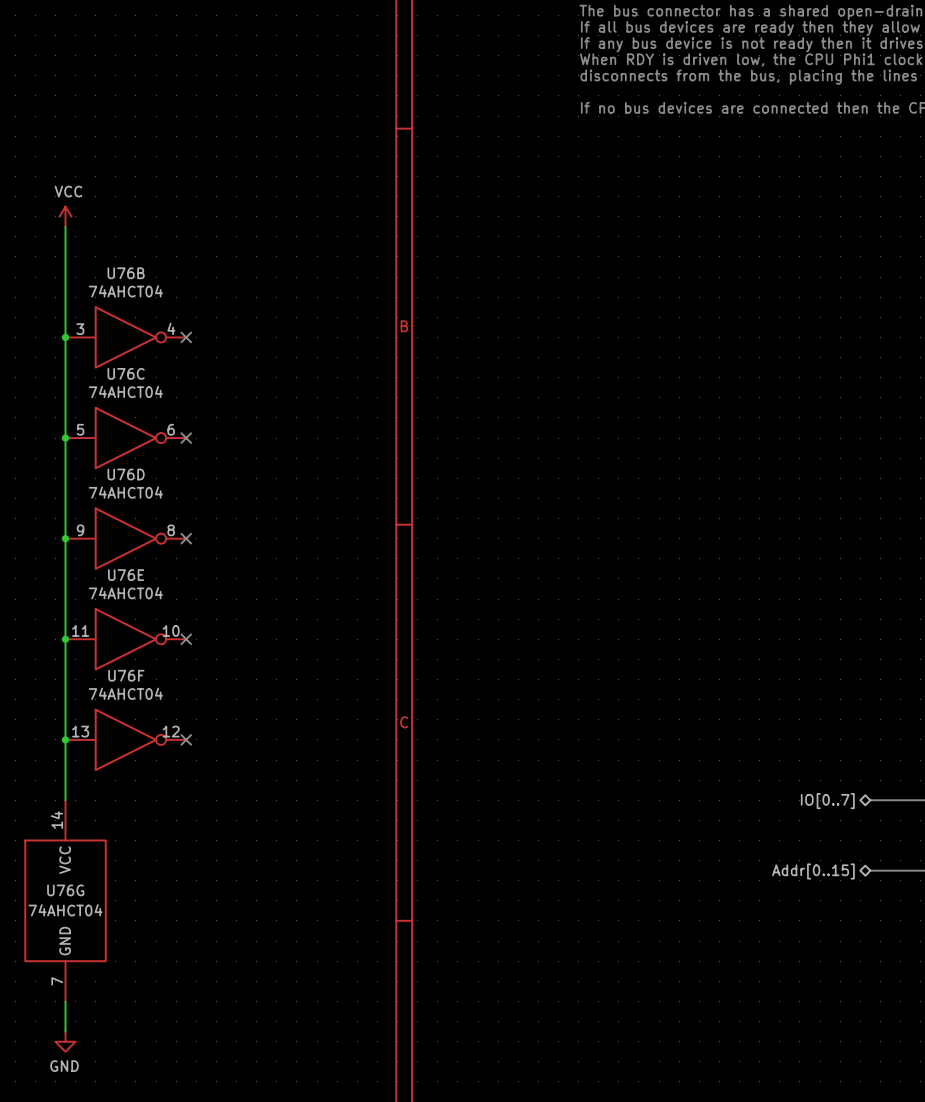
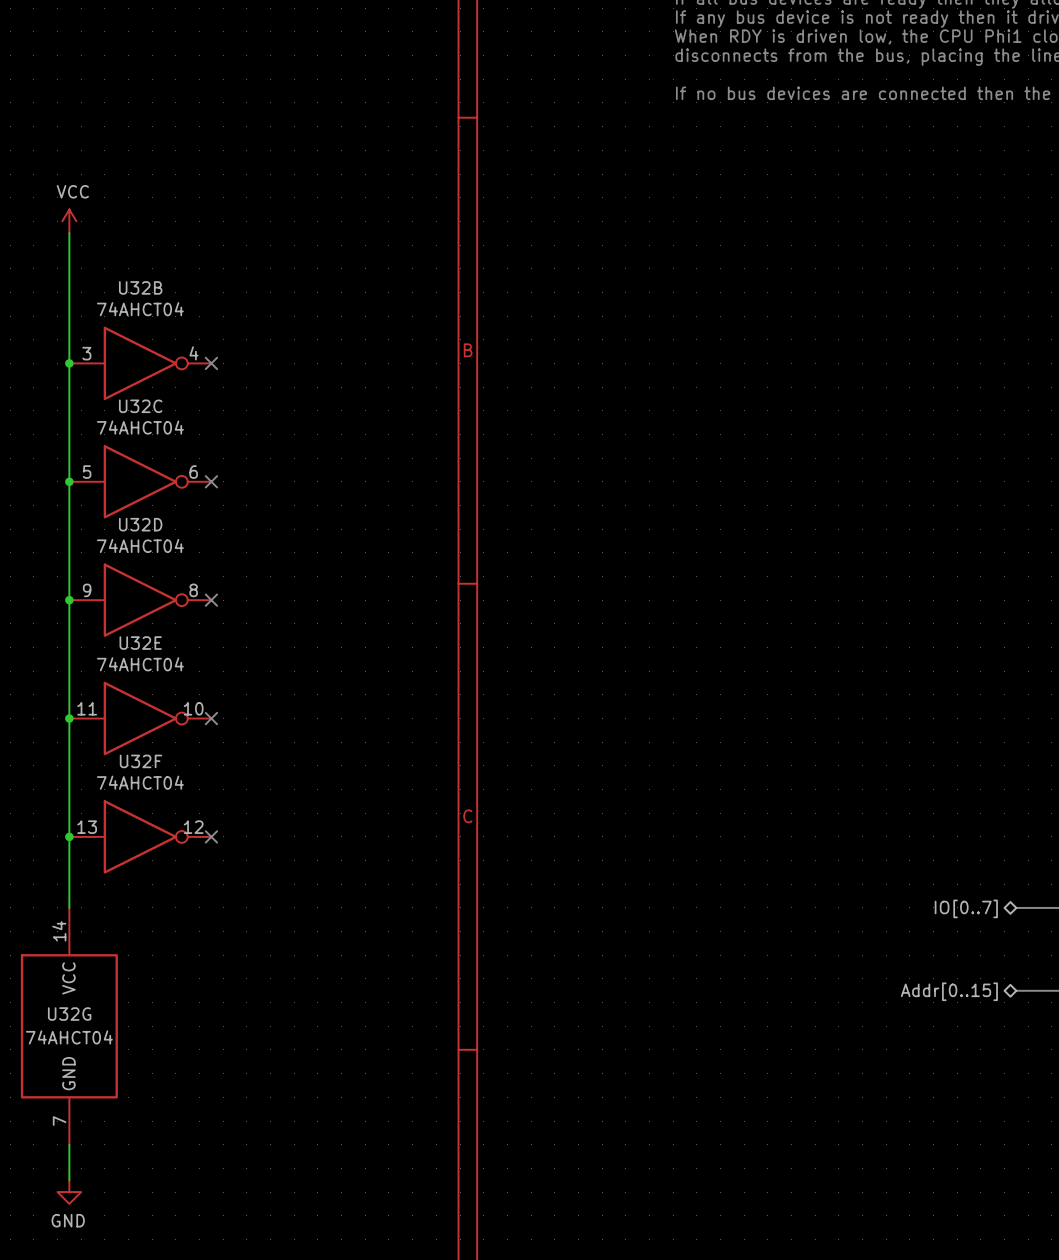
U76B name: U76B (126, 273) -> U32B (140, 287)
U76C name: U76C (126, 373) -> U32C (140, 406)
U76D name: U76D (126, 474) -> U32D (140, 524)
U76E name: U76E (126, 575) -> U32E (140, 643)
U76F name: U76F (126, 675) -> U32F (140, 761)
U76G name: U76G (65, 890) -> U32G (69, 1014)

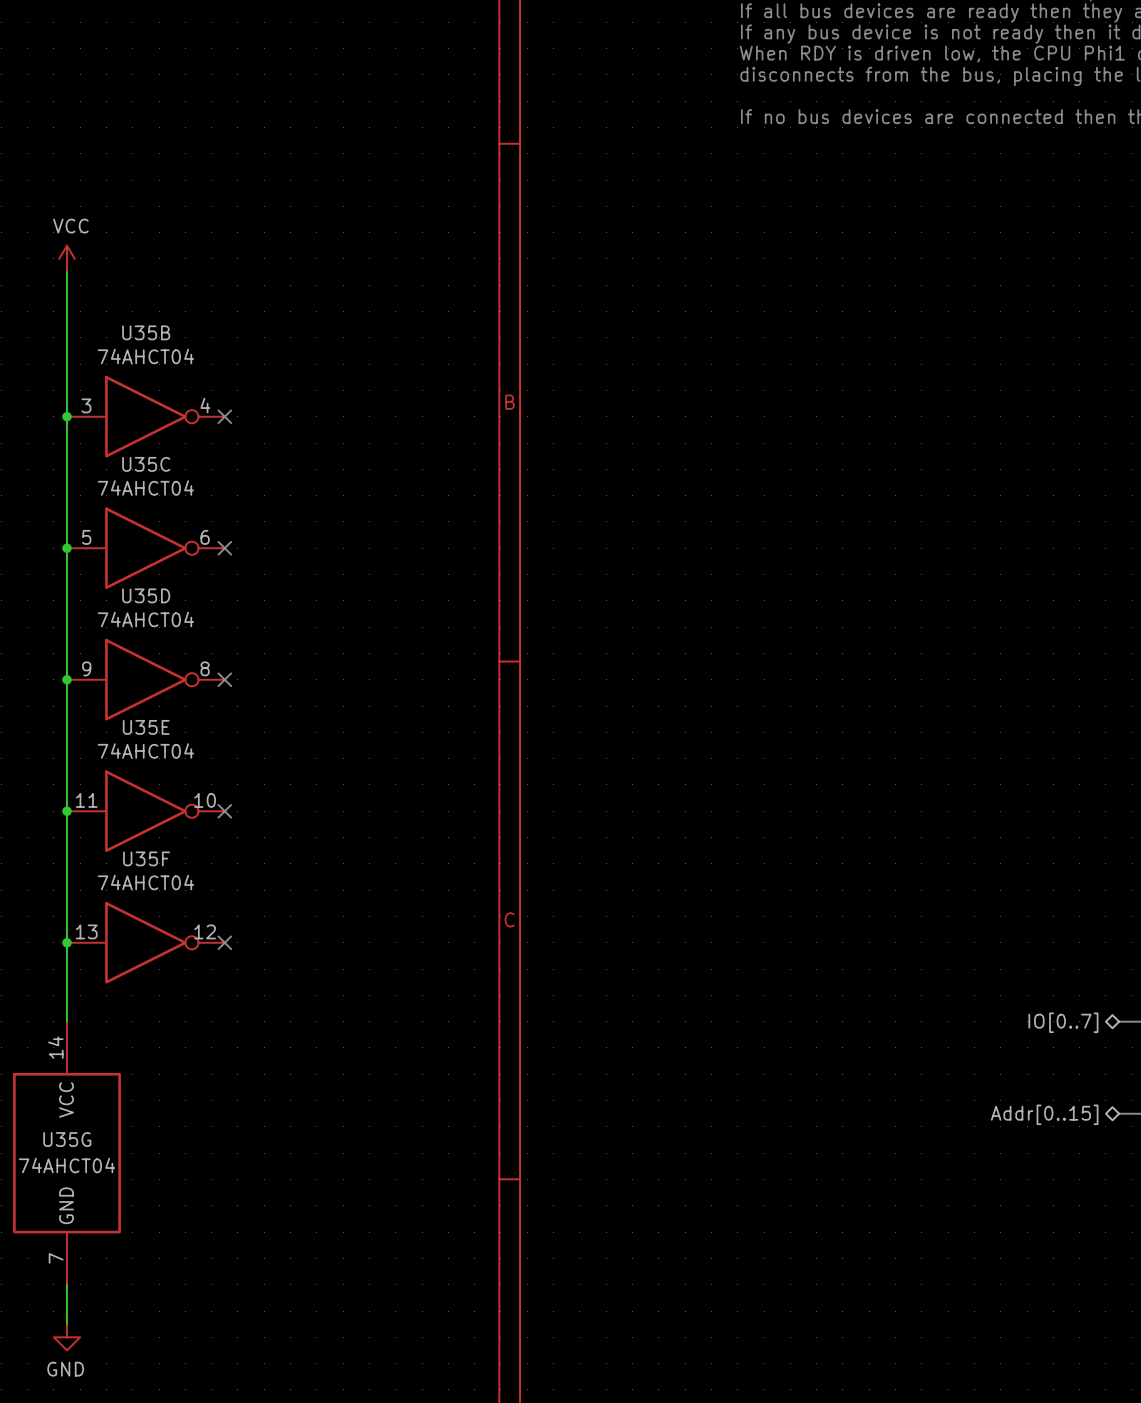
U32B name: U32B (140, 287) -> U35B (146, 332)
U32C name: U32C (140, 406) -> U35C (146, 464)
U32D name: U32D (140, 524) -> U35D (146, 595)
U32E name: U32E (140, 643) -> U35E (146, 727)
U32F name: U32F (140, 761) -> U35F (146, 858)
U32G name: U32G (69, 1014) -> U35G (67, 1139)

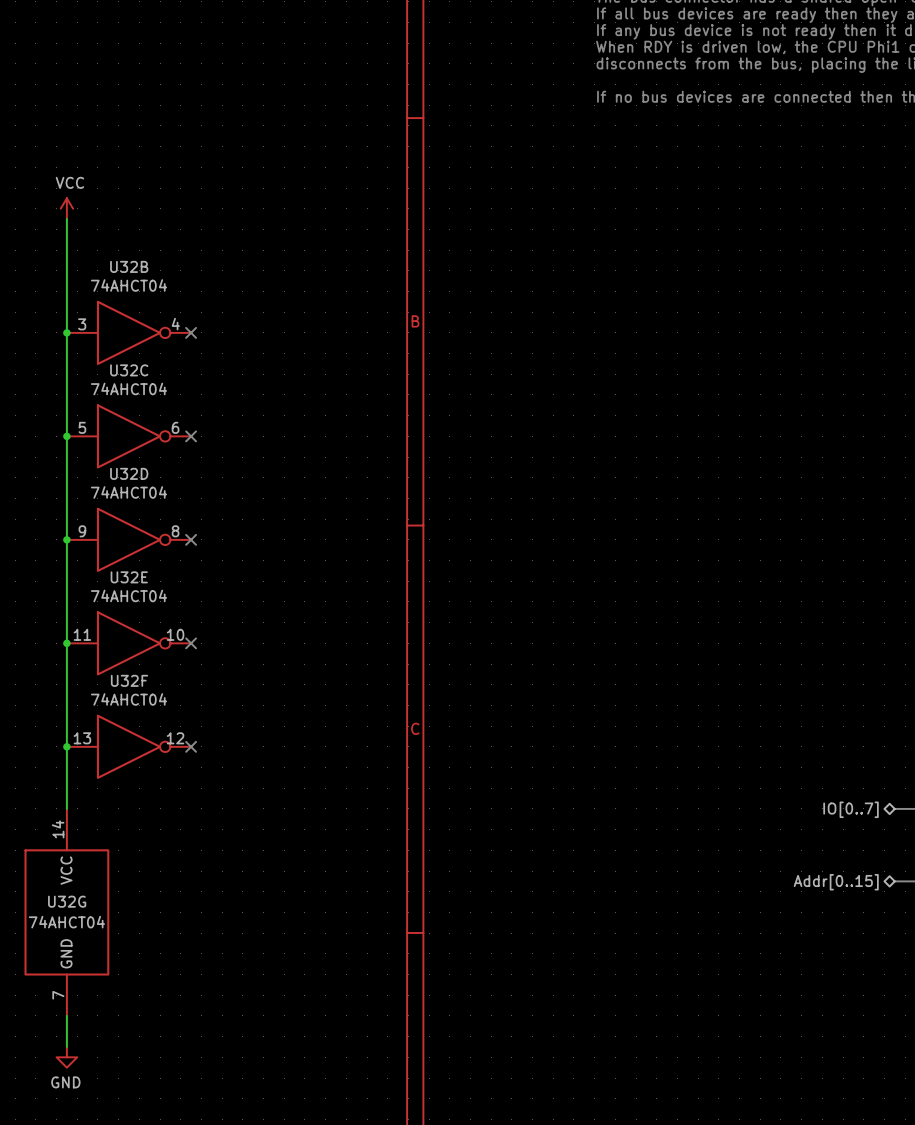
U35B name: U35B (146, 332) -> U32B (129, 266)
U35C name: U35C (146, 464) -> U32C (129, 370)
U35D name: U35D (146, 595) -> U32D (129, 473)
U35E name: U35E (146, 727) -> U32E (129, 577)
U35F name: U35F (146, 858) -> U32F (129, 680)
U35G name: U35G (67, 1139) -> U32G (67, 901)

